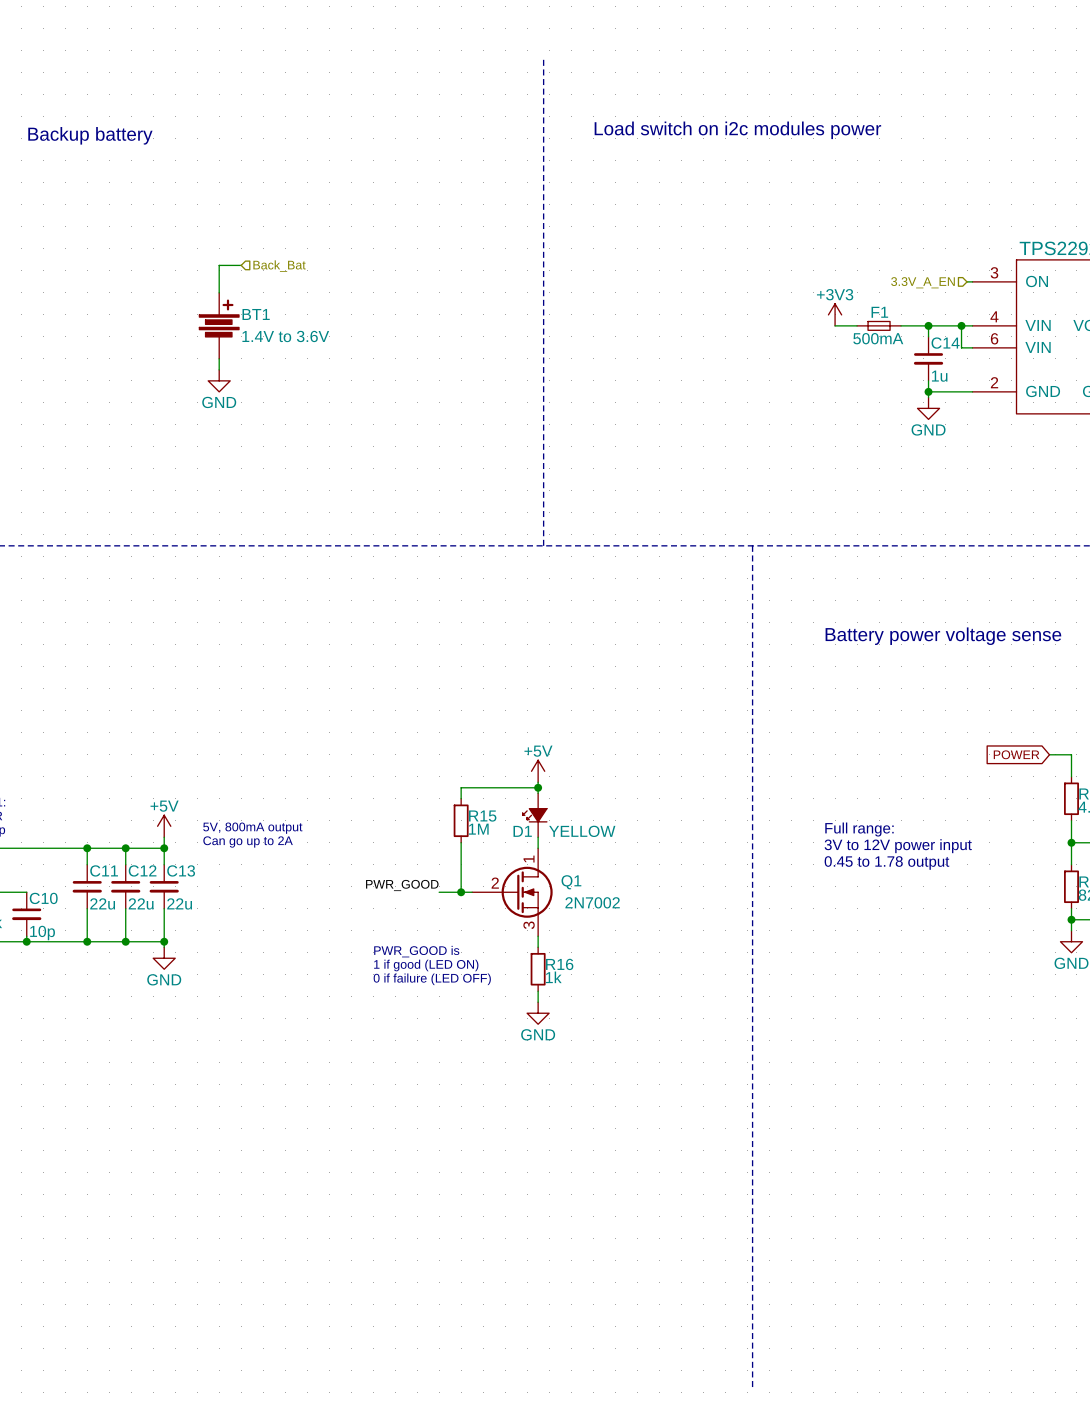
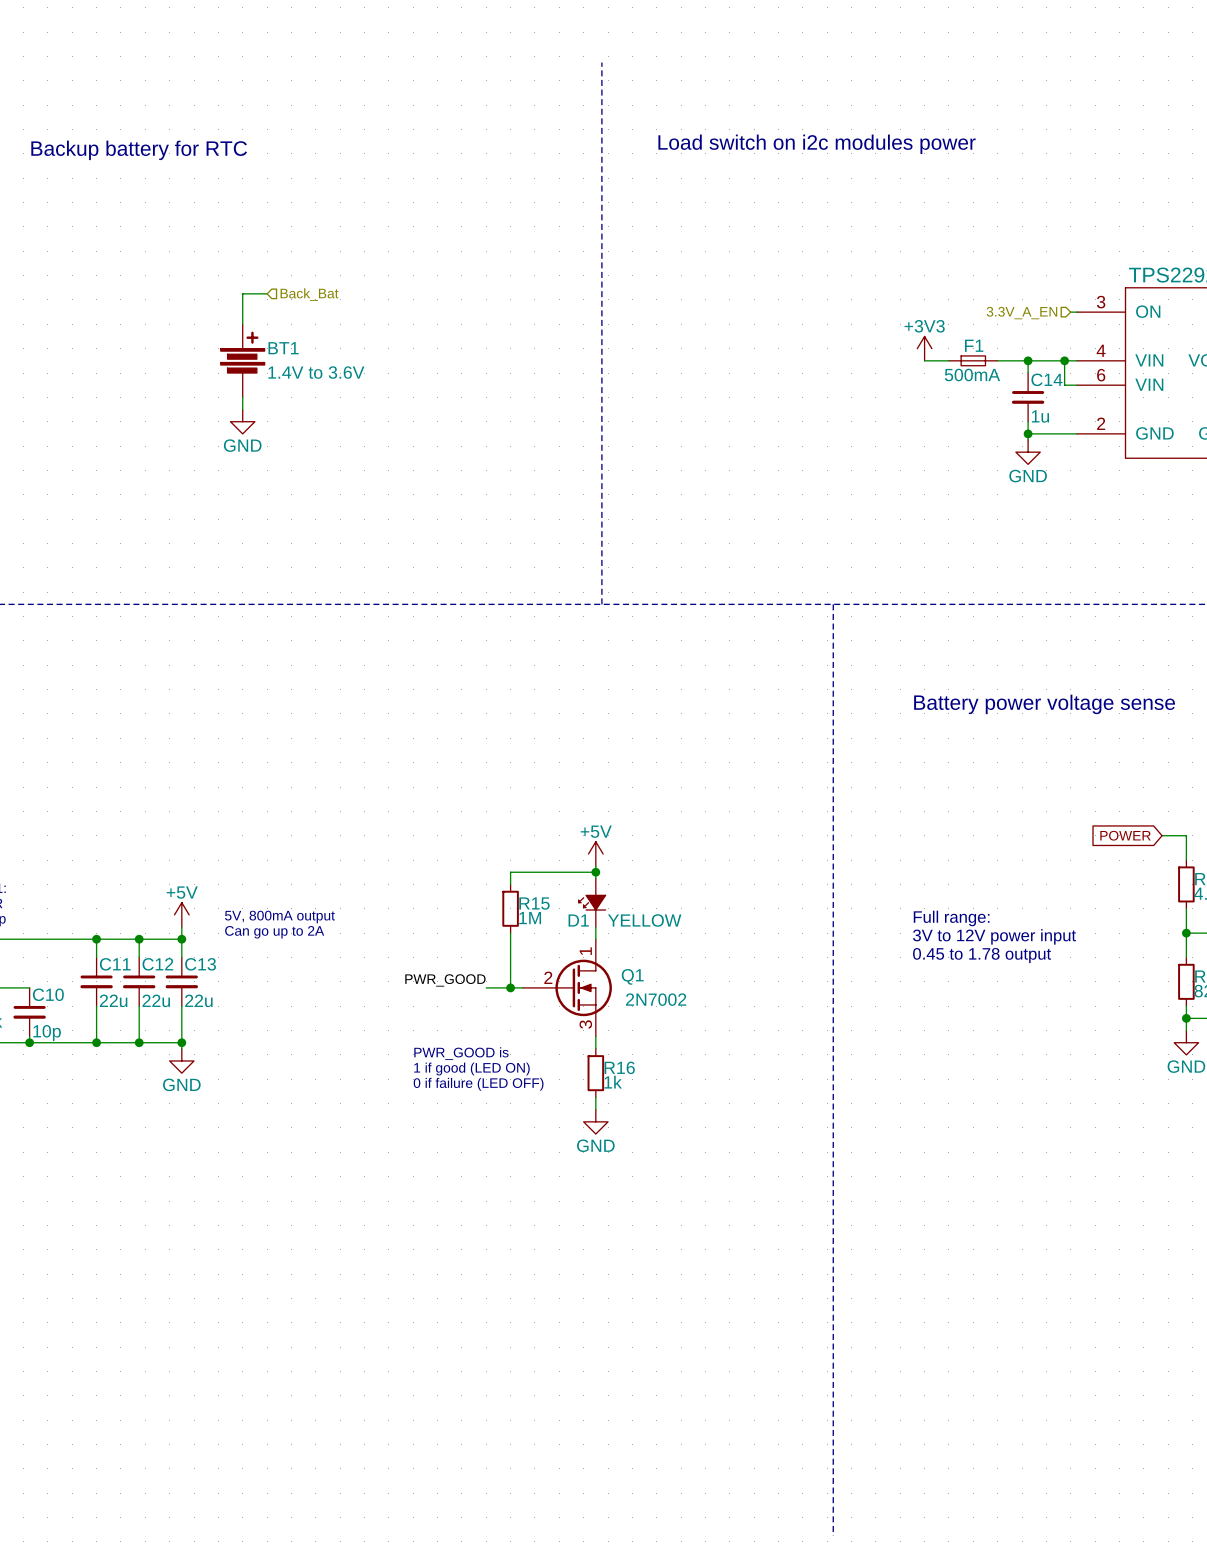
text: Backup battery (90, 135) -> Backup battery for RTC (139, 150)

